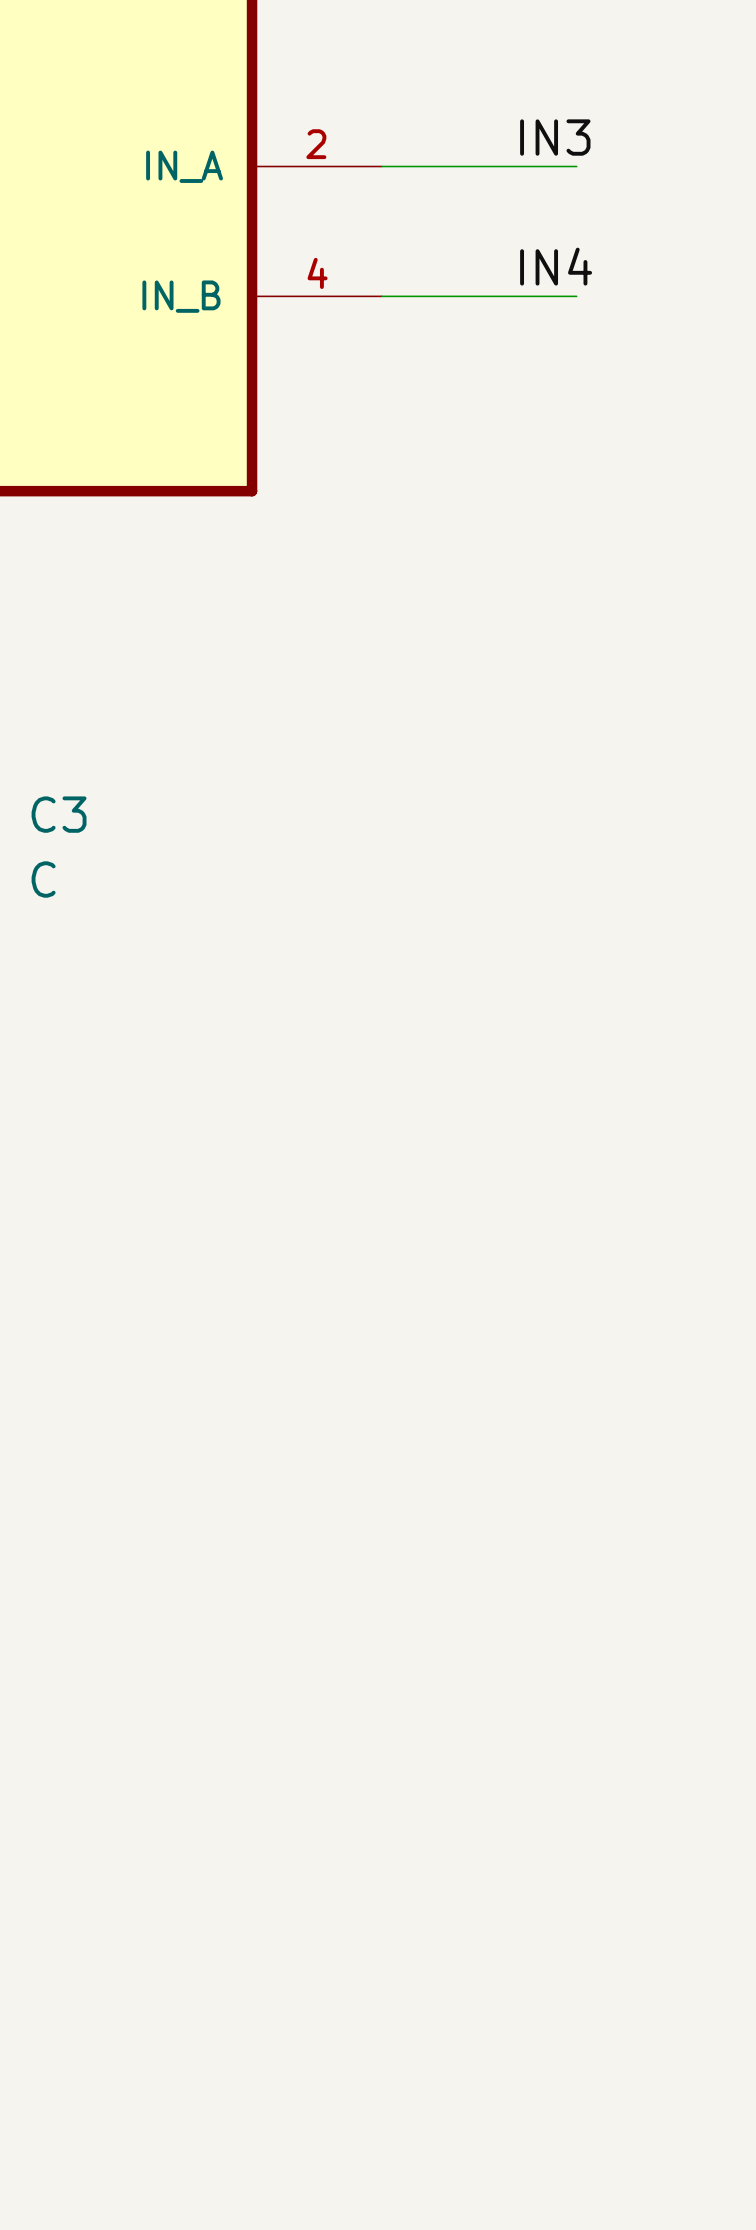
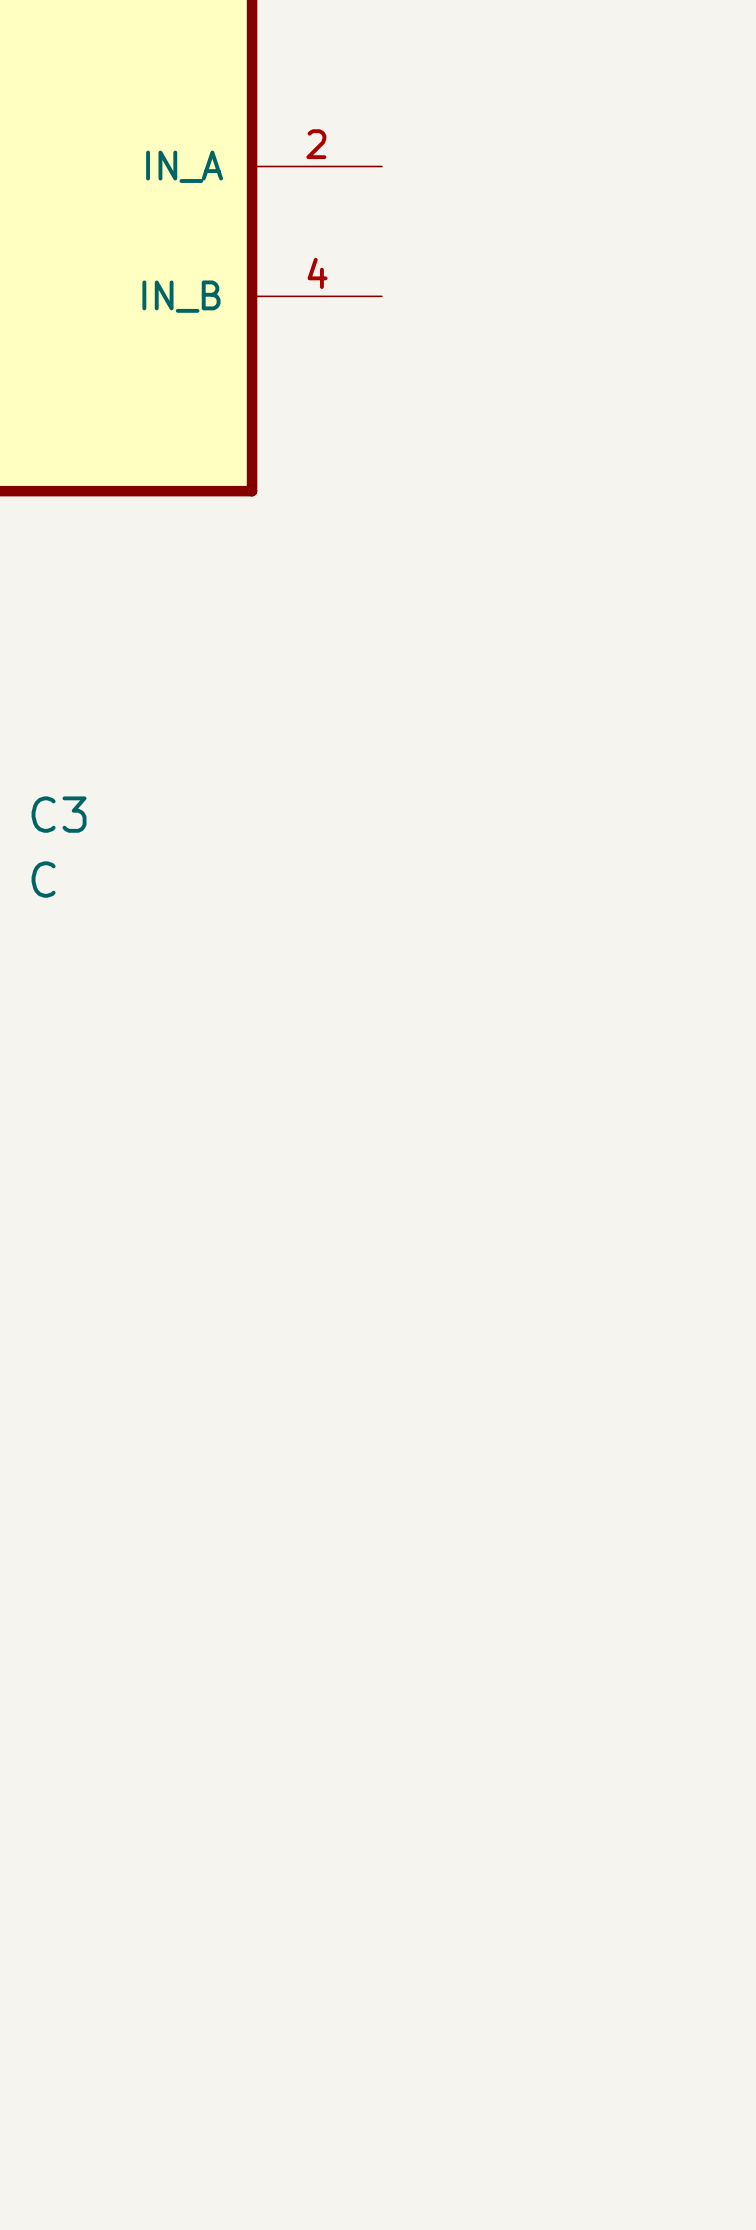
label: IN3 (555, 137) -> none
wire: (381, 166) (576, 166) -> none
label: IN4 (556, 266) -> none
wire: (381, 296) (576, 296) -> none

